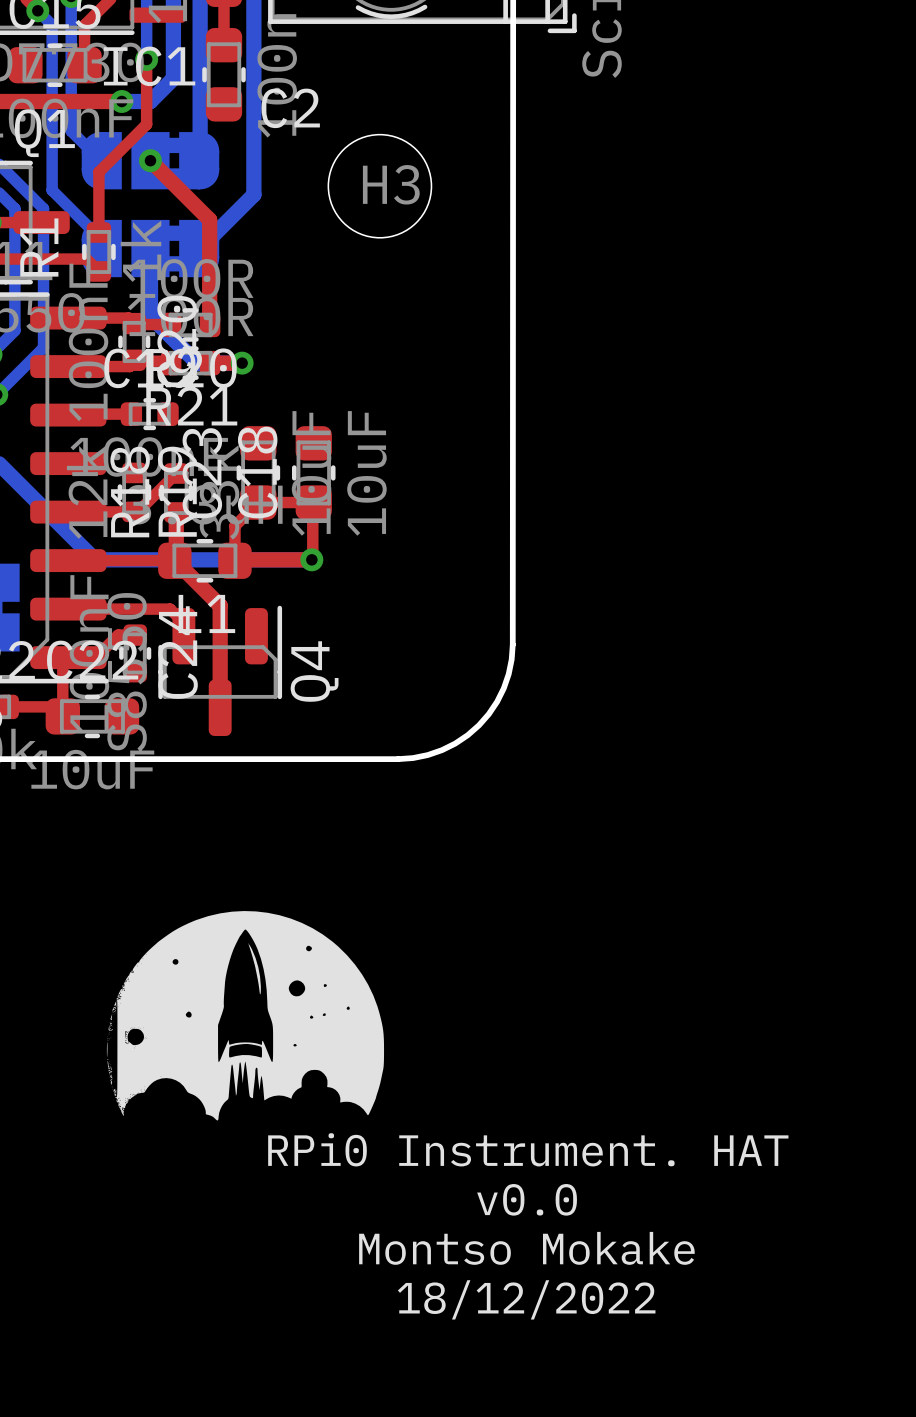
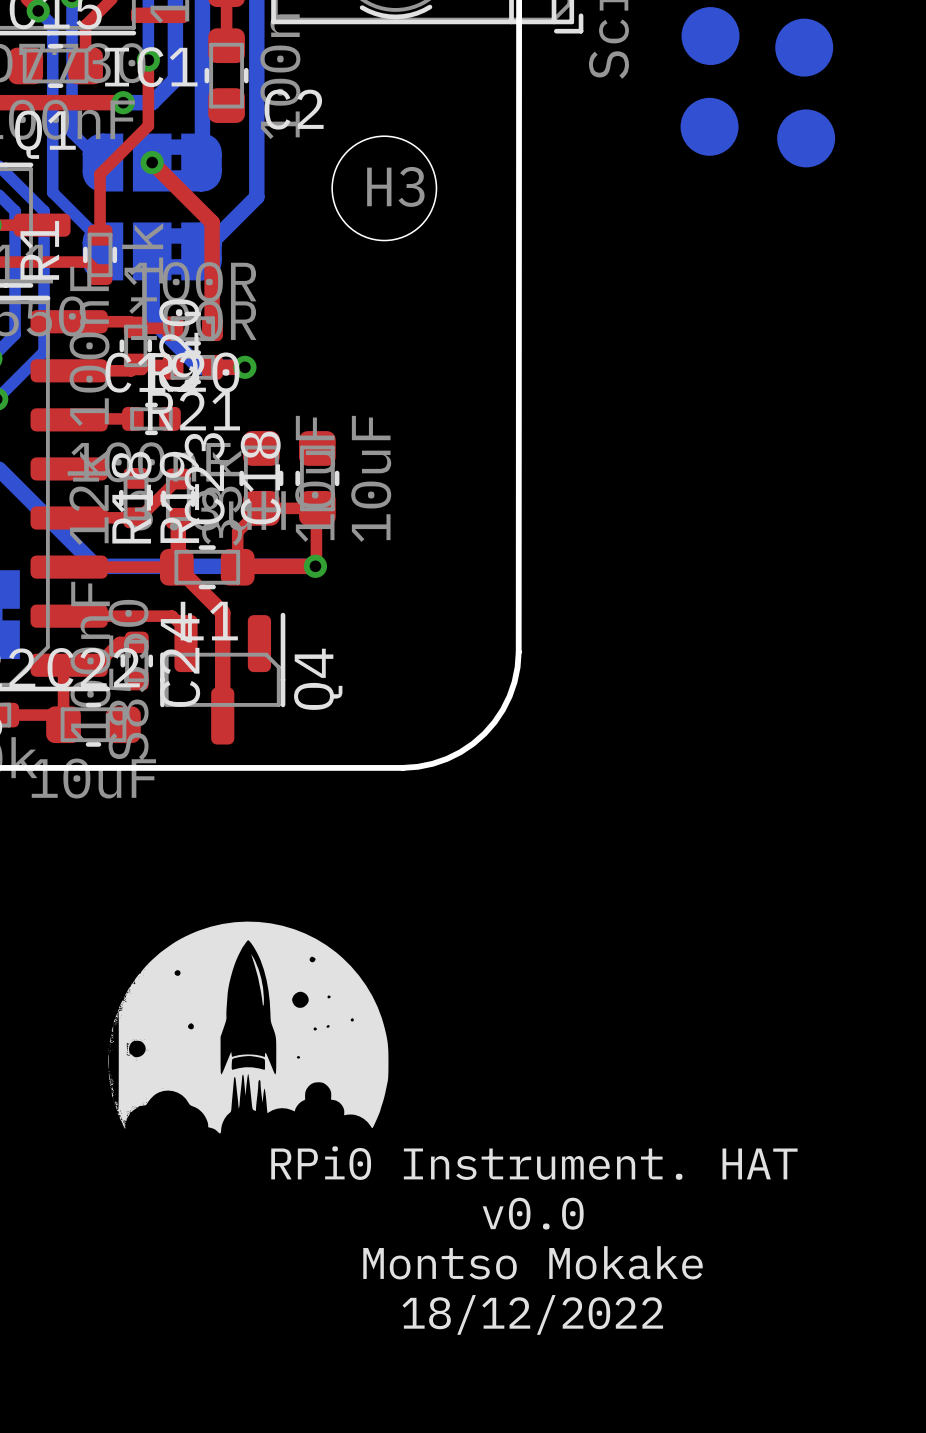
part: none -> (710, 36)
part: none -> (804, 47)
part: none -> (709, 126)
part: none -> (806, 138)

